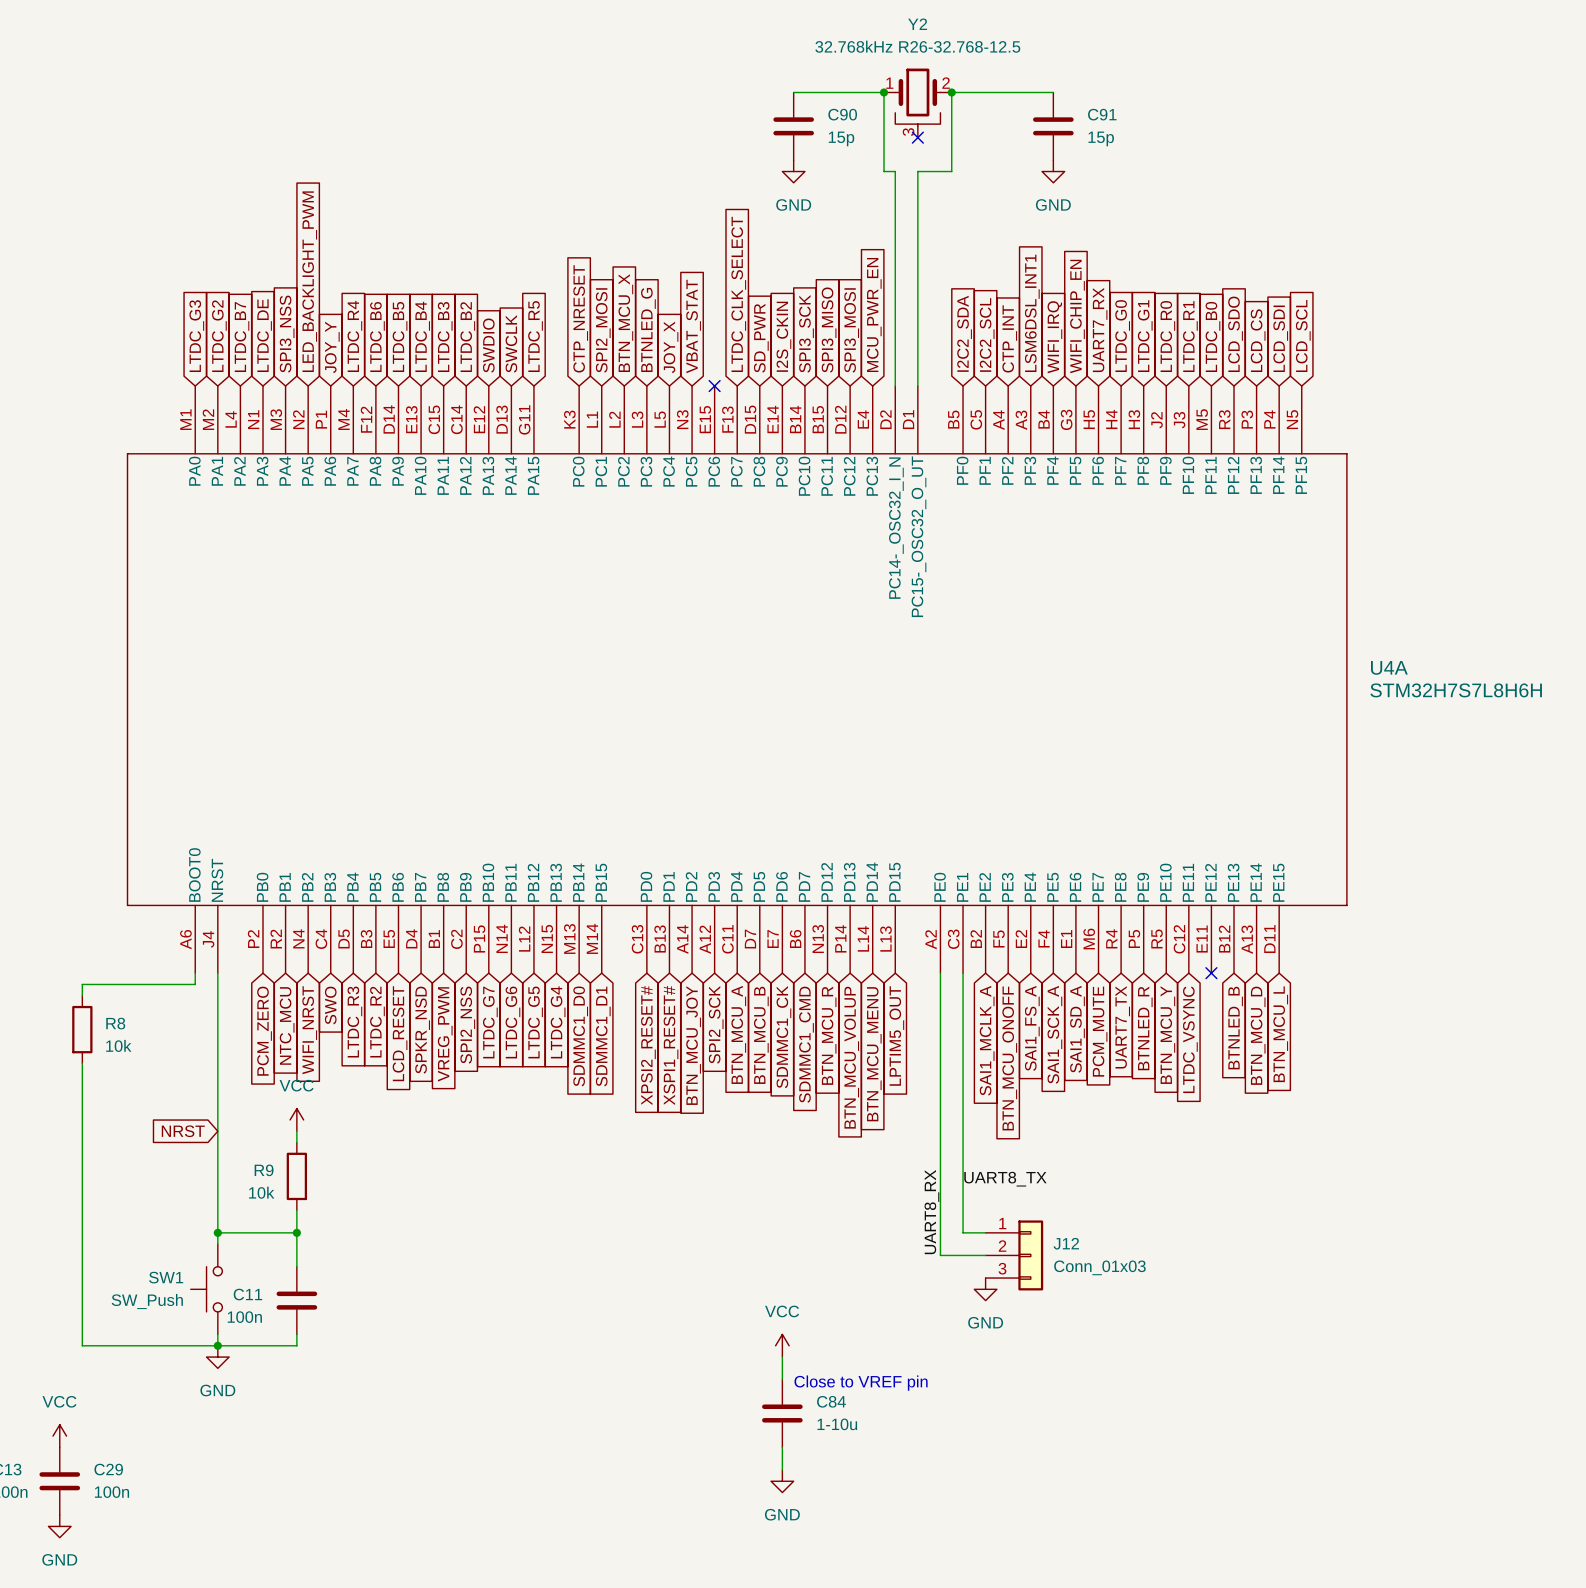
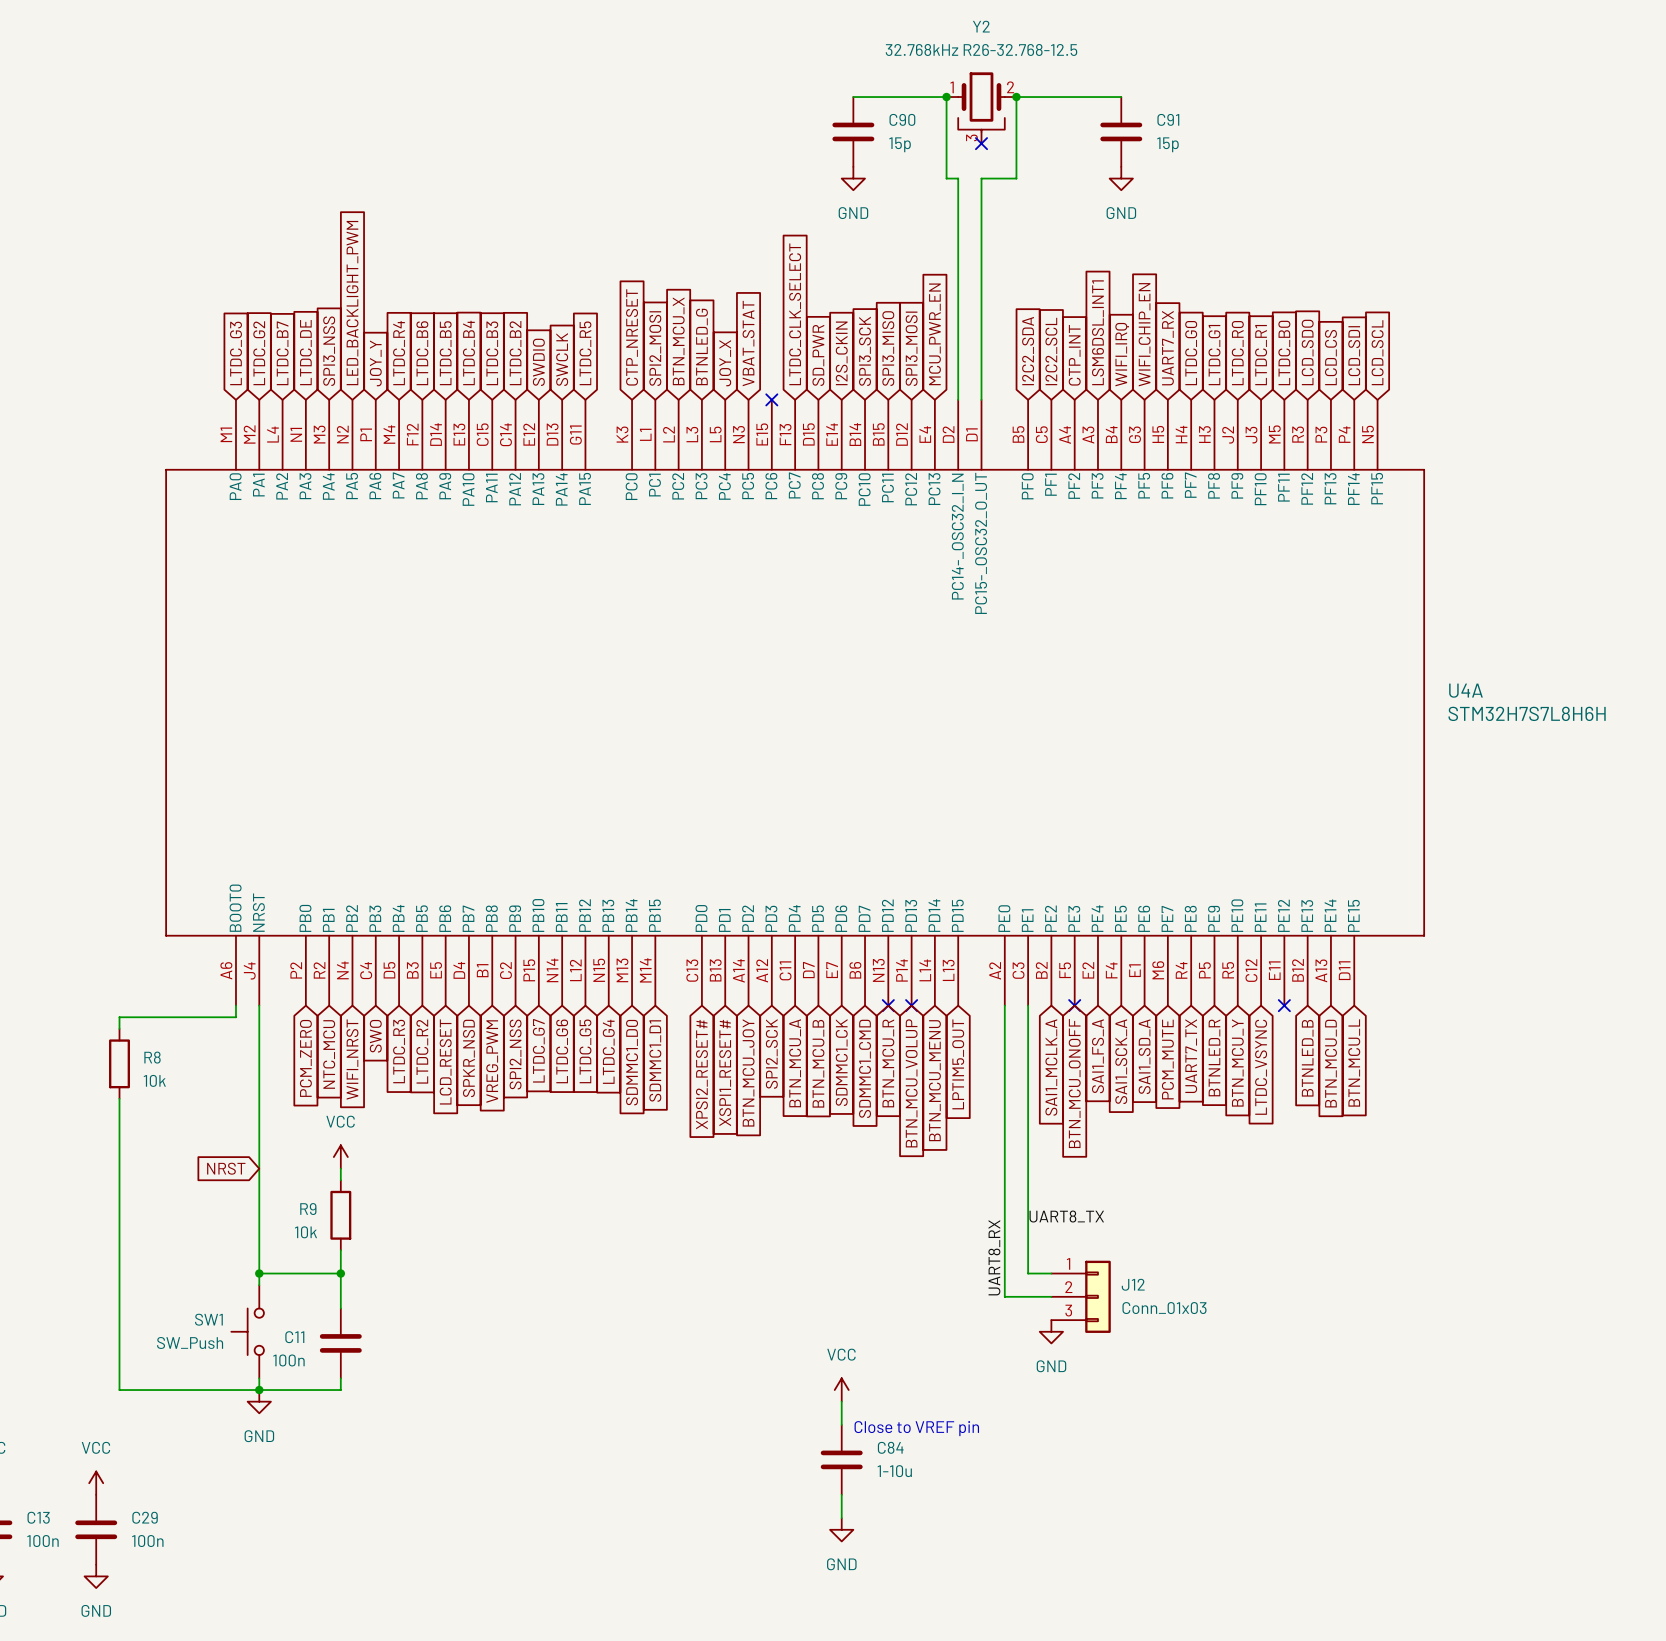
no-connect mark: none -> (888, 1005)
no-connect mark: none -> (911, 1005)
no-connect mark: none -> (1074, 1005)

